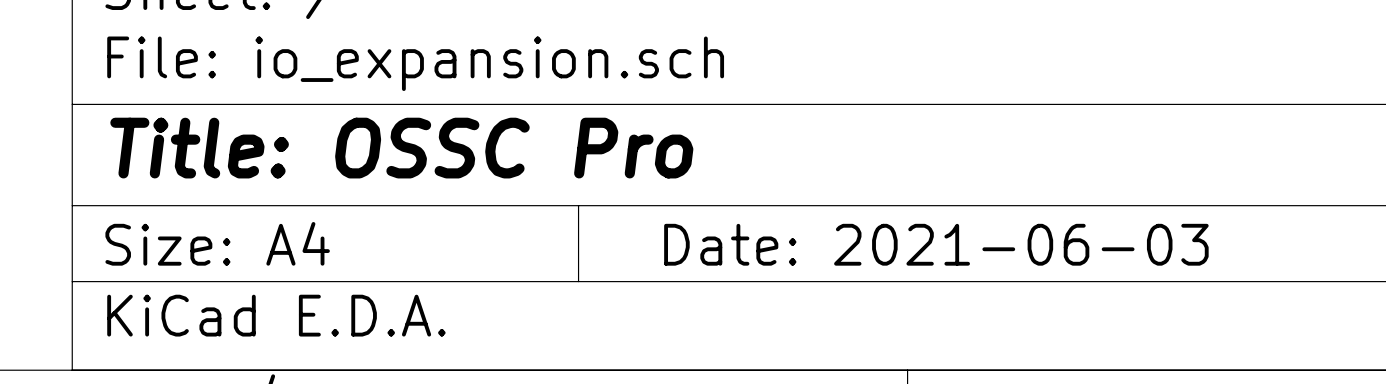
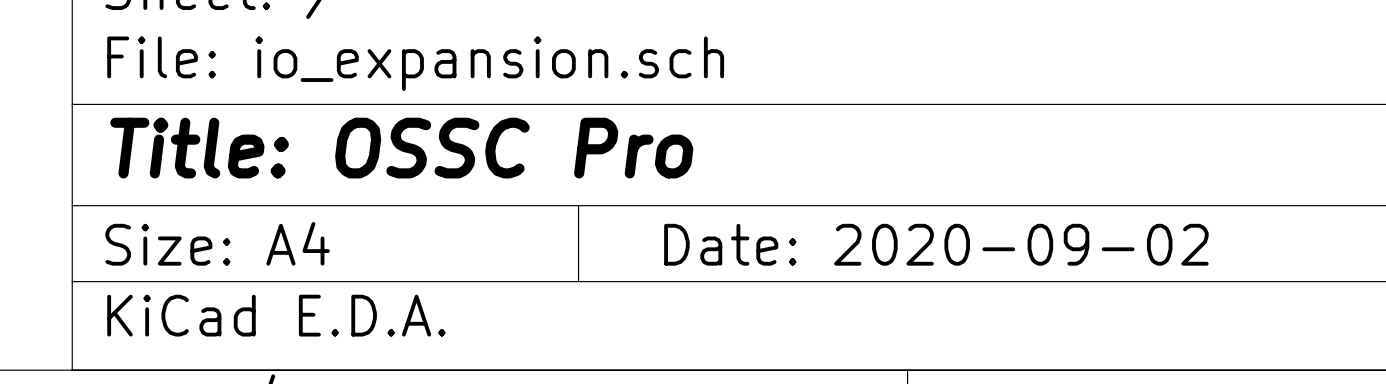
title block: Date: 2021-06-03 (936, 244) -> Date: 2020-09-02 (936, 244)

